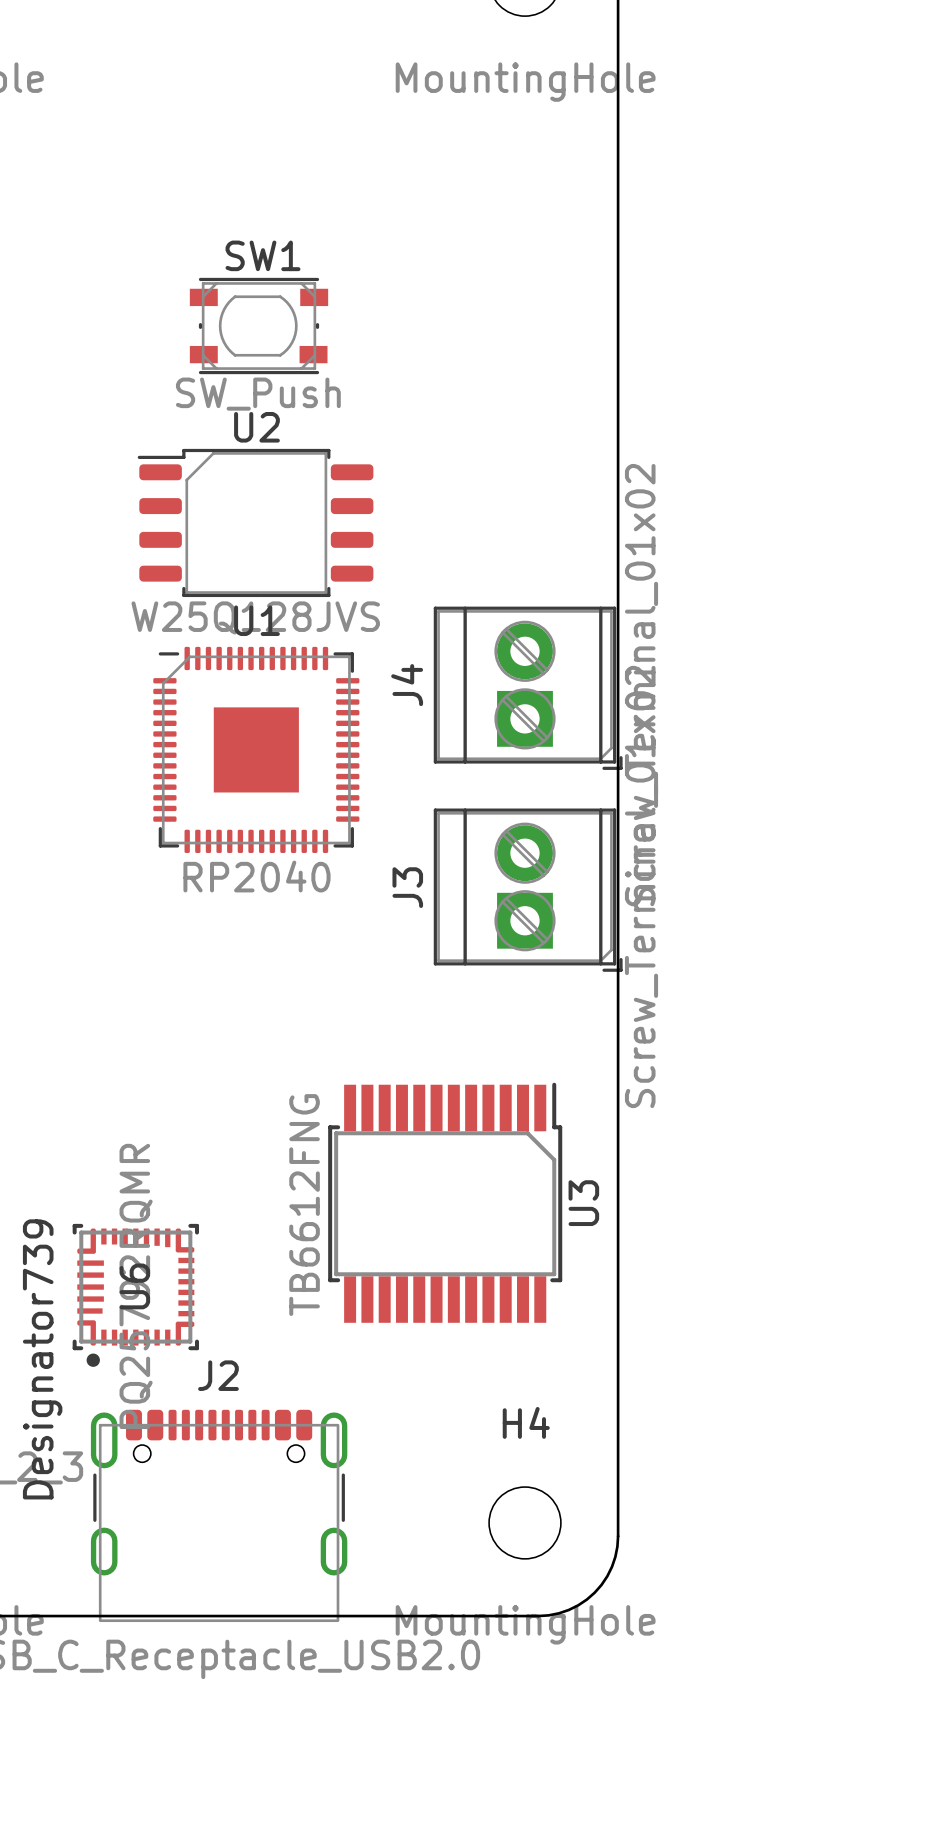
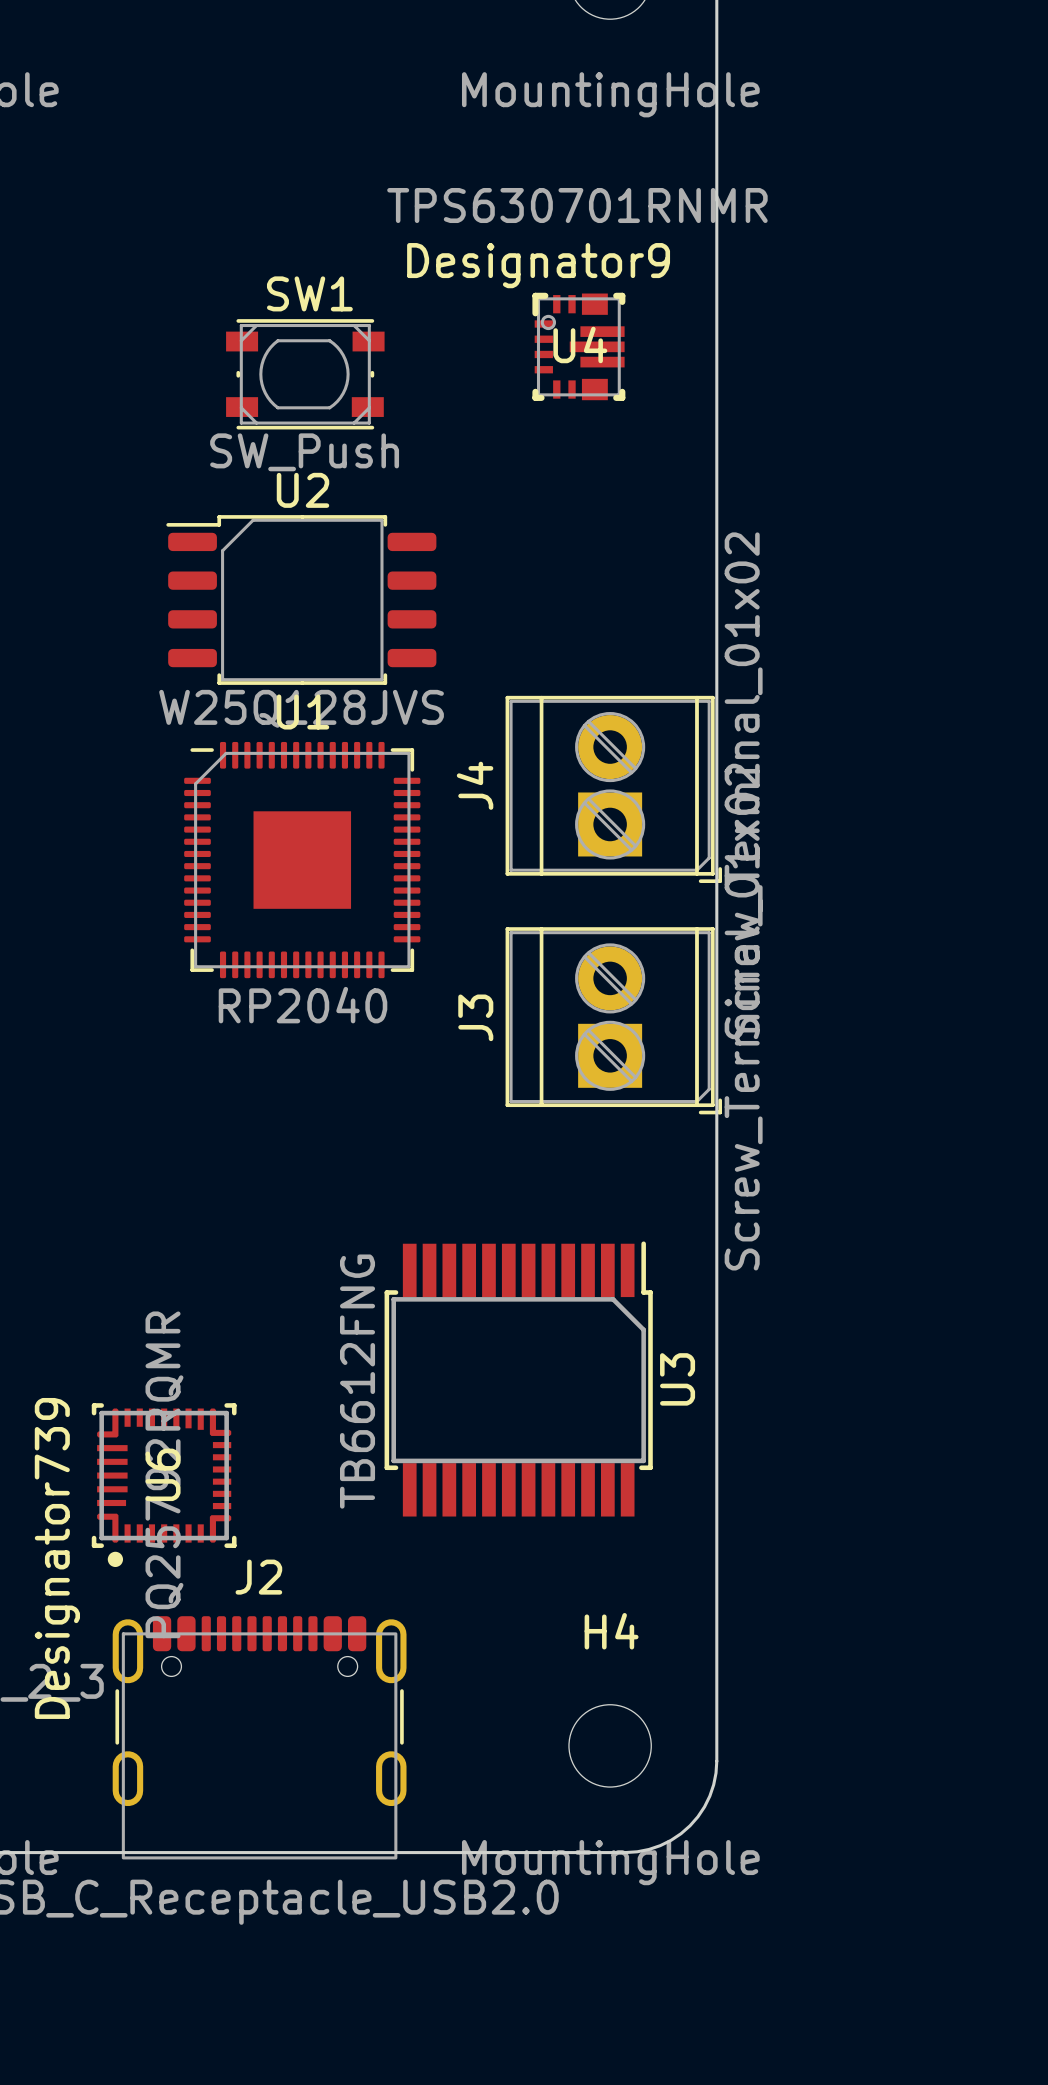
U4: none -> TPS630701RNMR (578, 346)

